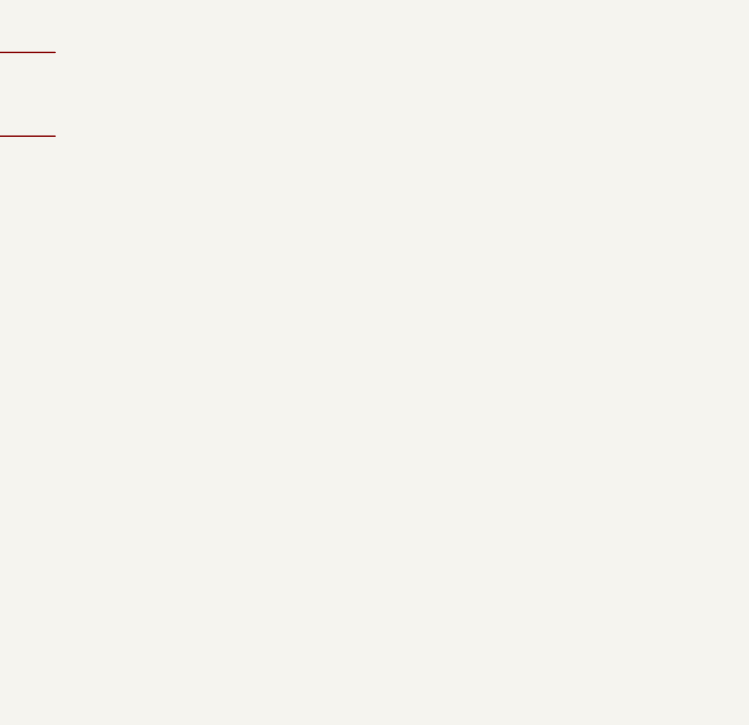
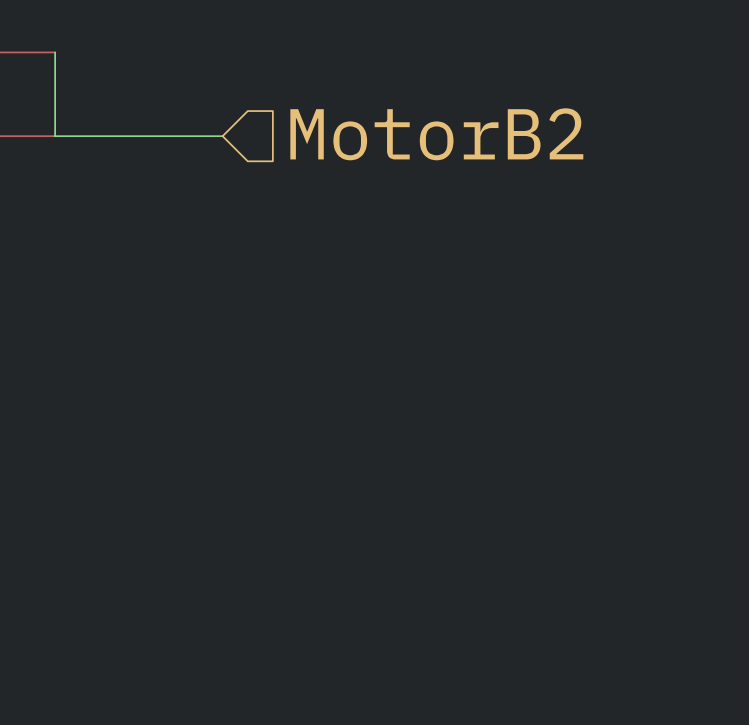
wire: none -> (55, 52) (55, 136) (222, 136)
hierarchical label: none -> MotorB2 (436, 134)

